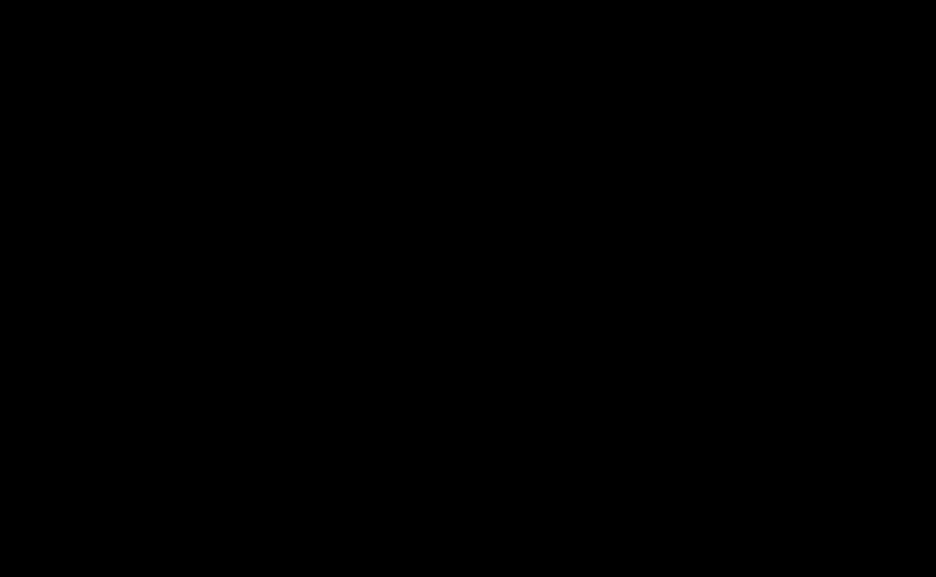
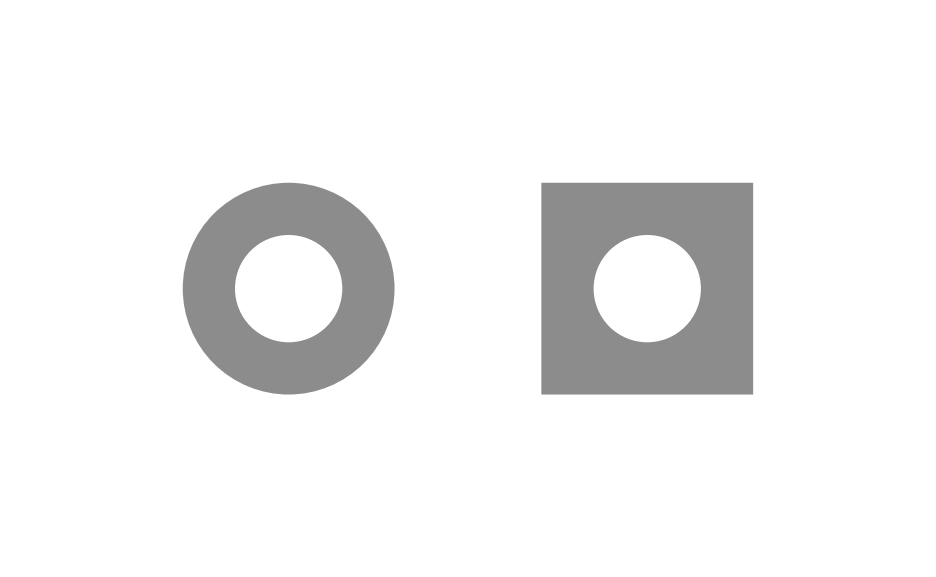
part: none -> (467, 288)

